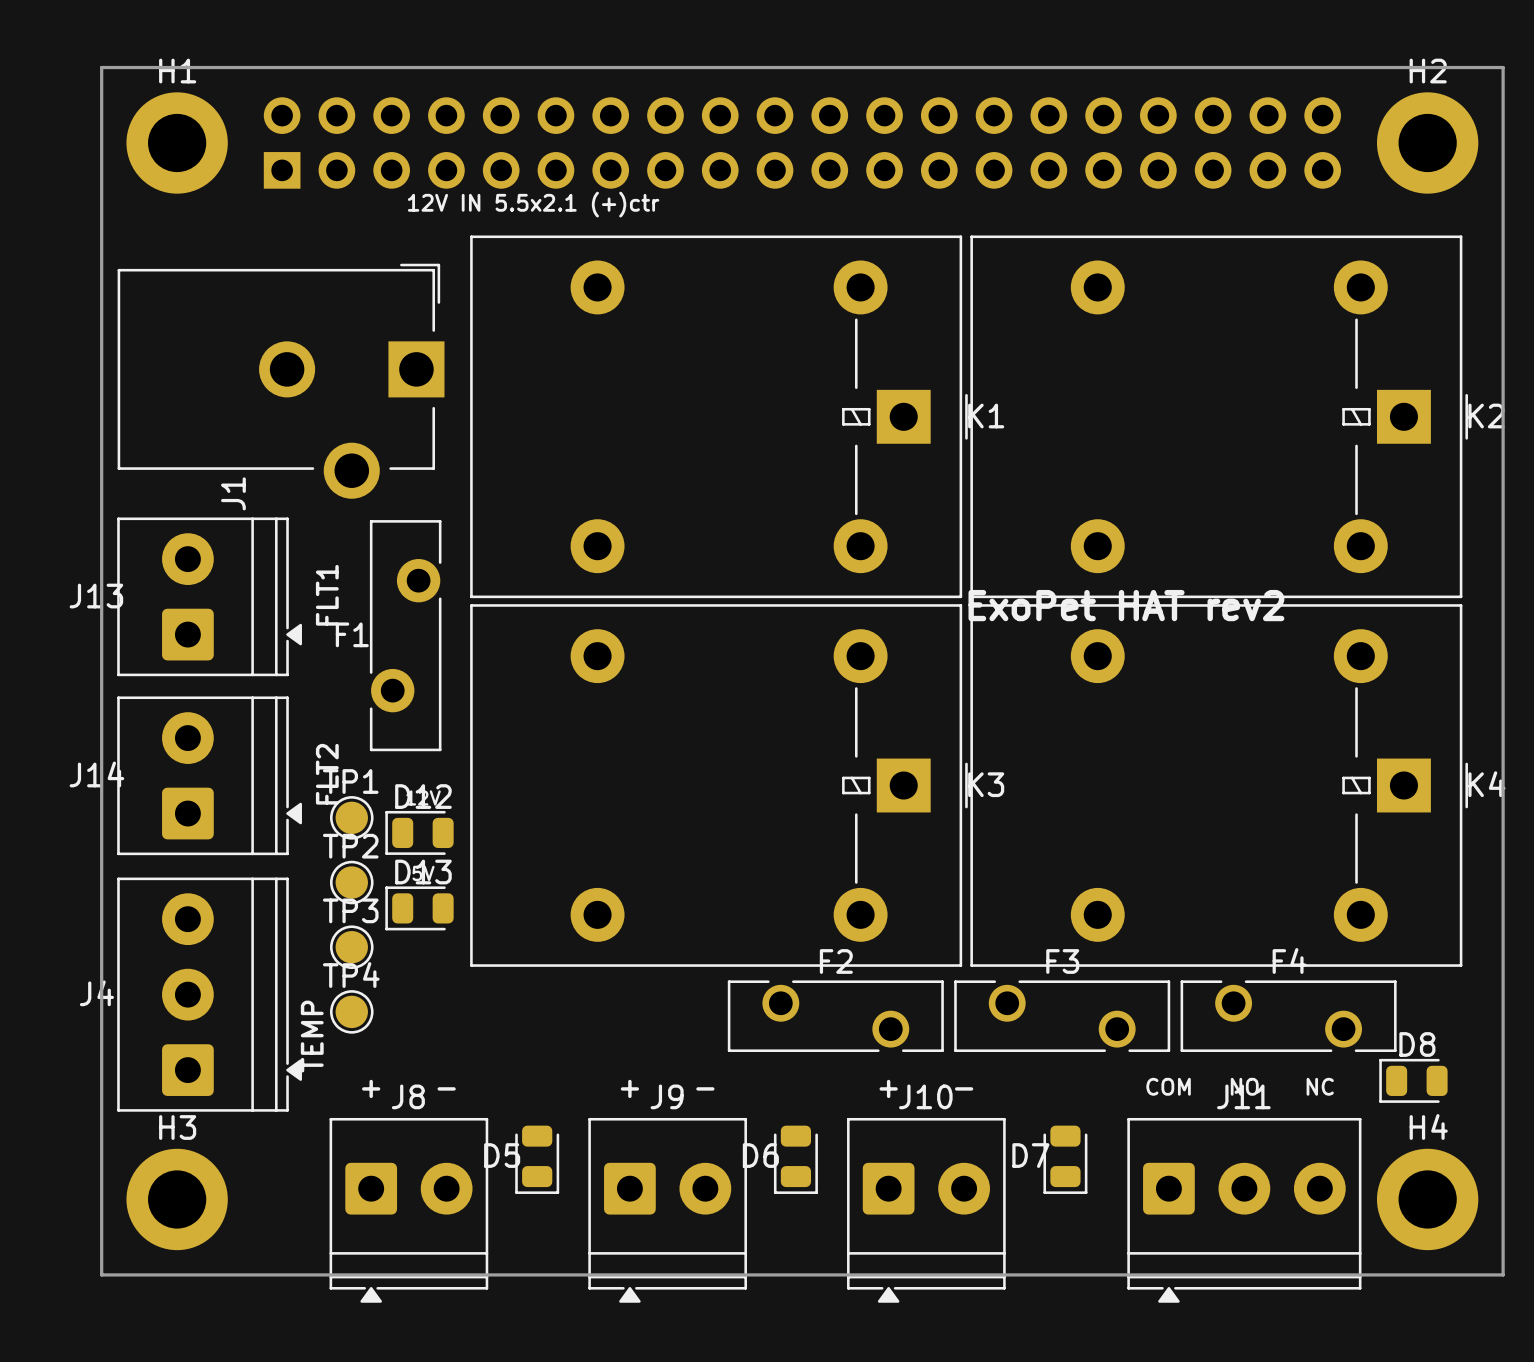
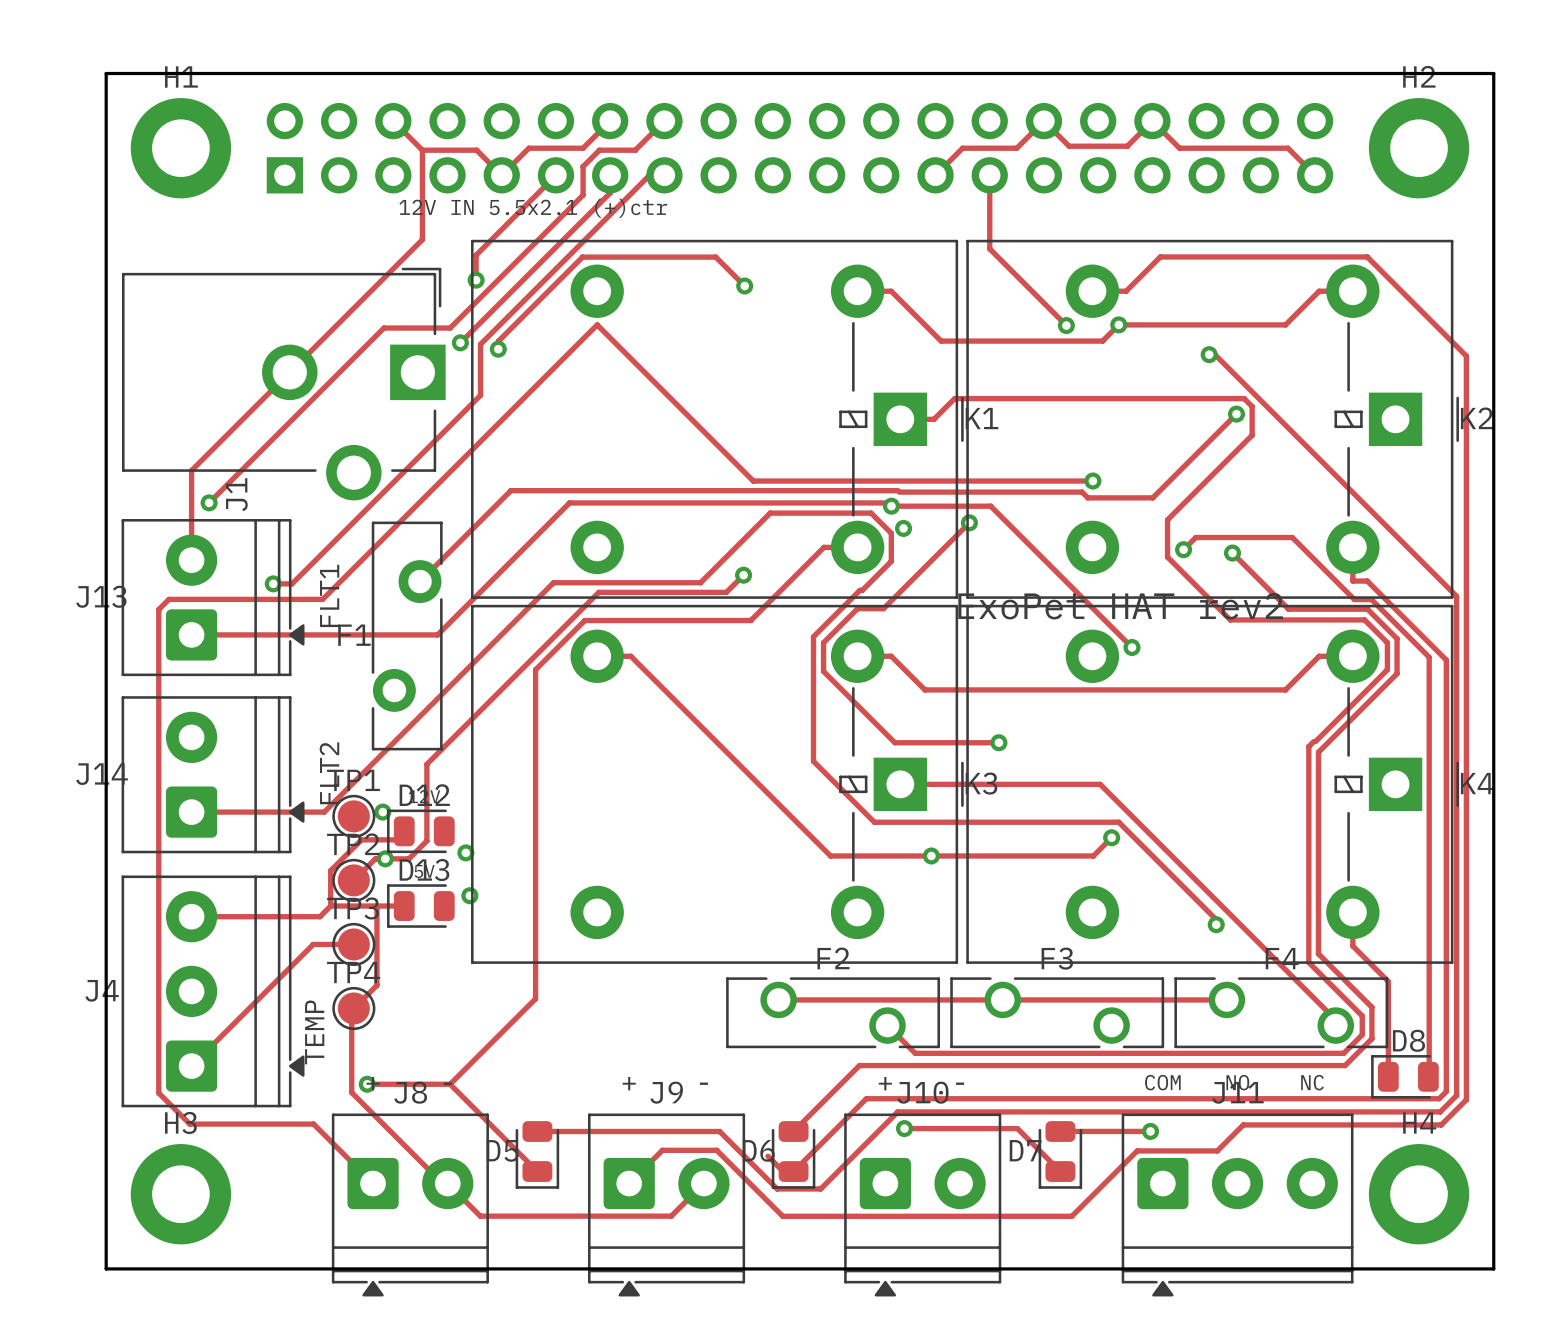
track: none -> (393, 121) (422, 150)
track: none -> (610, 121) (583, 148) (528, 148) (501, 175) (476, 150) (422, 150)
track: none -> (664, 121) (635, 150) (599, 150) (583, 166) (583, 195) (450, 328) (383, 328) (209, 502)
track: none -> (422, 150) (422, 239) (191, 470) (191, 560)
track: none -> (555, 175) (476, 255) (476, 280)
track: none -> (610, 175) (610, 193) (460, 342)
track: none -> (664, 175) (649, 175) (480, 344) (480, 395) (291, 583) (273, 583)
track: none -> (935, 175) (962, 148) (1016, 148) (1043, 121) (1069, 146) (1127, 146) (1152, 121) (1179, 148) (1287, 148) (1315, 175)
track: none -> (989, 175) (989, 248) (1066, 325)
via: none -> (476, 280)
track: none -> (744, 286) (715, 257) (582, 257) (498, 341) (498, 349)
via: none -> (744, 286)
track: none -> (857, 291) (891, 291) (941, 341) (1102, 341) (1118, 324) (1285, 324) (1319, 291) (1352, 291)
track: none -> (1092, 291) (1126, 291) (1160, 256) (1367, 256) (1466, 356) (1466, 1099) (1441, 1124) (1243, 1124) (1217, 1150) (1137, 1150) (1071, 1216) (782, 1216) (716, 1150) (662, 1150) (629, 1183)
via: none -> (1118, 324)
via: none -> (1066, 325)
via: none -> (460, 342)
via: none -> (498, 349)
track: none -> (1209, 354) (1214, 354) (1456, 596) (1456, 1095) (1440, 1111) (897, 1111) (820, 1188) (777, 1188) (719, 1131) (537, 1131)
via: none -> (1209, 354)
track: none -> (1236, 414) (1152, 497) (1087, 497) (1082, 492) (899, 492)
via: none -> (1236, 414)
track: none -> (900, 419) (933, 419) (954, 398) (1244, 398) (1252, 406) (1252, 435) (1167, 519) (1167, 557) (1230, 619) (1364, 619) (1387, 642) (1387, 669) (1315, 741)
track: none -> (1092, 481) (753, 481) (597, 324) (322, 599) (168, 599) (158, 609) (158, 1093) (189, 1124) (313, 1124) (373, 1183)
via: none -> (1092, 481)
track: none -> (897, 490) (510, 490) (420, 581)
via: none -> (209, 502)
via: none -> (891, 506)
track: none -> (969, 522) (883, 608) (857, 608) (823, 642) (823, 671) (894, 742) (998, 742)
via: none -> (969, 522)
via: none -> (903, 528)
track: none -> (857, 547) (823, 547) (750, 620) (584, 620) (535, 669) (535, 998) (450, 1084)
track: none -> (1352, 547) (1352, 581) (1367, 581) (1446, 660) (1446, 1091) (1439, 1098) (866, 1098) (793, 1171) (783, 1171) (767, 1156)
track: none -> (1183, 549) (1195, 537) (1292, 537) (1354, 599) (1371, 599) (1429, 657) (1429, 1075)
via: none -> (1183, 549)
track: none -> (1232, 553) (1288, 609) (1367, 609) (1397, 638) (1397, 673) (1318, 752) (1318, 953) (1371, 1007) (1371, 1038) (1345, 1065) (859, 1065) (793, 1131)
via: none -> (1232, 553)
track: none -> (743, 575) (726, 592) (598, 592) (426, 764) (426, 840) (408, 858) (375, 858) (353, 880)
via: none -> (743, 575)
via: none -> (273, 583)
track: none -> (191, 634) (437, 634) (569, 502) (888, 502) (891, 506) (990, 506) (1132, 647)
via: none -> (1132, 647)
track: none -> (597, 656) (630, 656) (830, 855) (1093, 855) (1111, 837)
track: none -> (857, 656) (891, 656) (924, 689) (1285, 689) (1319, 656) (1352, 656)
track: none -> (1313, 741) (1308, 746) (1308, 962) (1362, 1016) (1362, 1034) (1343, 1053) (915, 1053) (887, 1025)
via: none -> (998, 742)
track: none -> (900, 784) (1100, 784) (1335, 1019) (1335, 1025)
track: none -> (191, 812) (324, 812) (553, 582) (700, 582) (770, 513) (871, 513) (891, 533) (891, 561) (813, 636) (813, 761) (874, 822) (1118, 822) (1216, 919) (1216, 924)
via: none -> (382, 812)
track: none -> (404, 831) (395, 839) (361, 839) (330, 870) (330, 906)
via: none -> (1111, 837)
via: none -> (465, 852)
via: none -> (931, 855)
via: none -> (385, 858)
via: none -> (469, 895)
track: none -> (330, 906) (404, 906)
track: none -> (330, 906) (320, 916) (191, 916)
track: none -> (376, 906) (376, 985) (351, 1010) (351, 1092) (442, 1183) (447, 1183) (480, 1216) (671, 1216) (703, 1183)
track: none -> (1352, 912) (1352, 946) (1388, 981) (1388, 1076)
via: none -> (1216, 924)
track: none -> (353, 944) (313, 944) (191, 1066)
track: none -> (778, 999) (1226, 999)
track: none -> (367, 1084) (450, 1084)
via: none -> (367, 1084)
track: none -> (450, 1084) (537, 1171)
track: none -> (904, 1128) (1017, 1128) (1060, 1171)
via: none -> (904, 1128)
track: none -> (1060, 1131) (1150, 1131)
via: none -> (1150, 1131)

